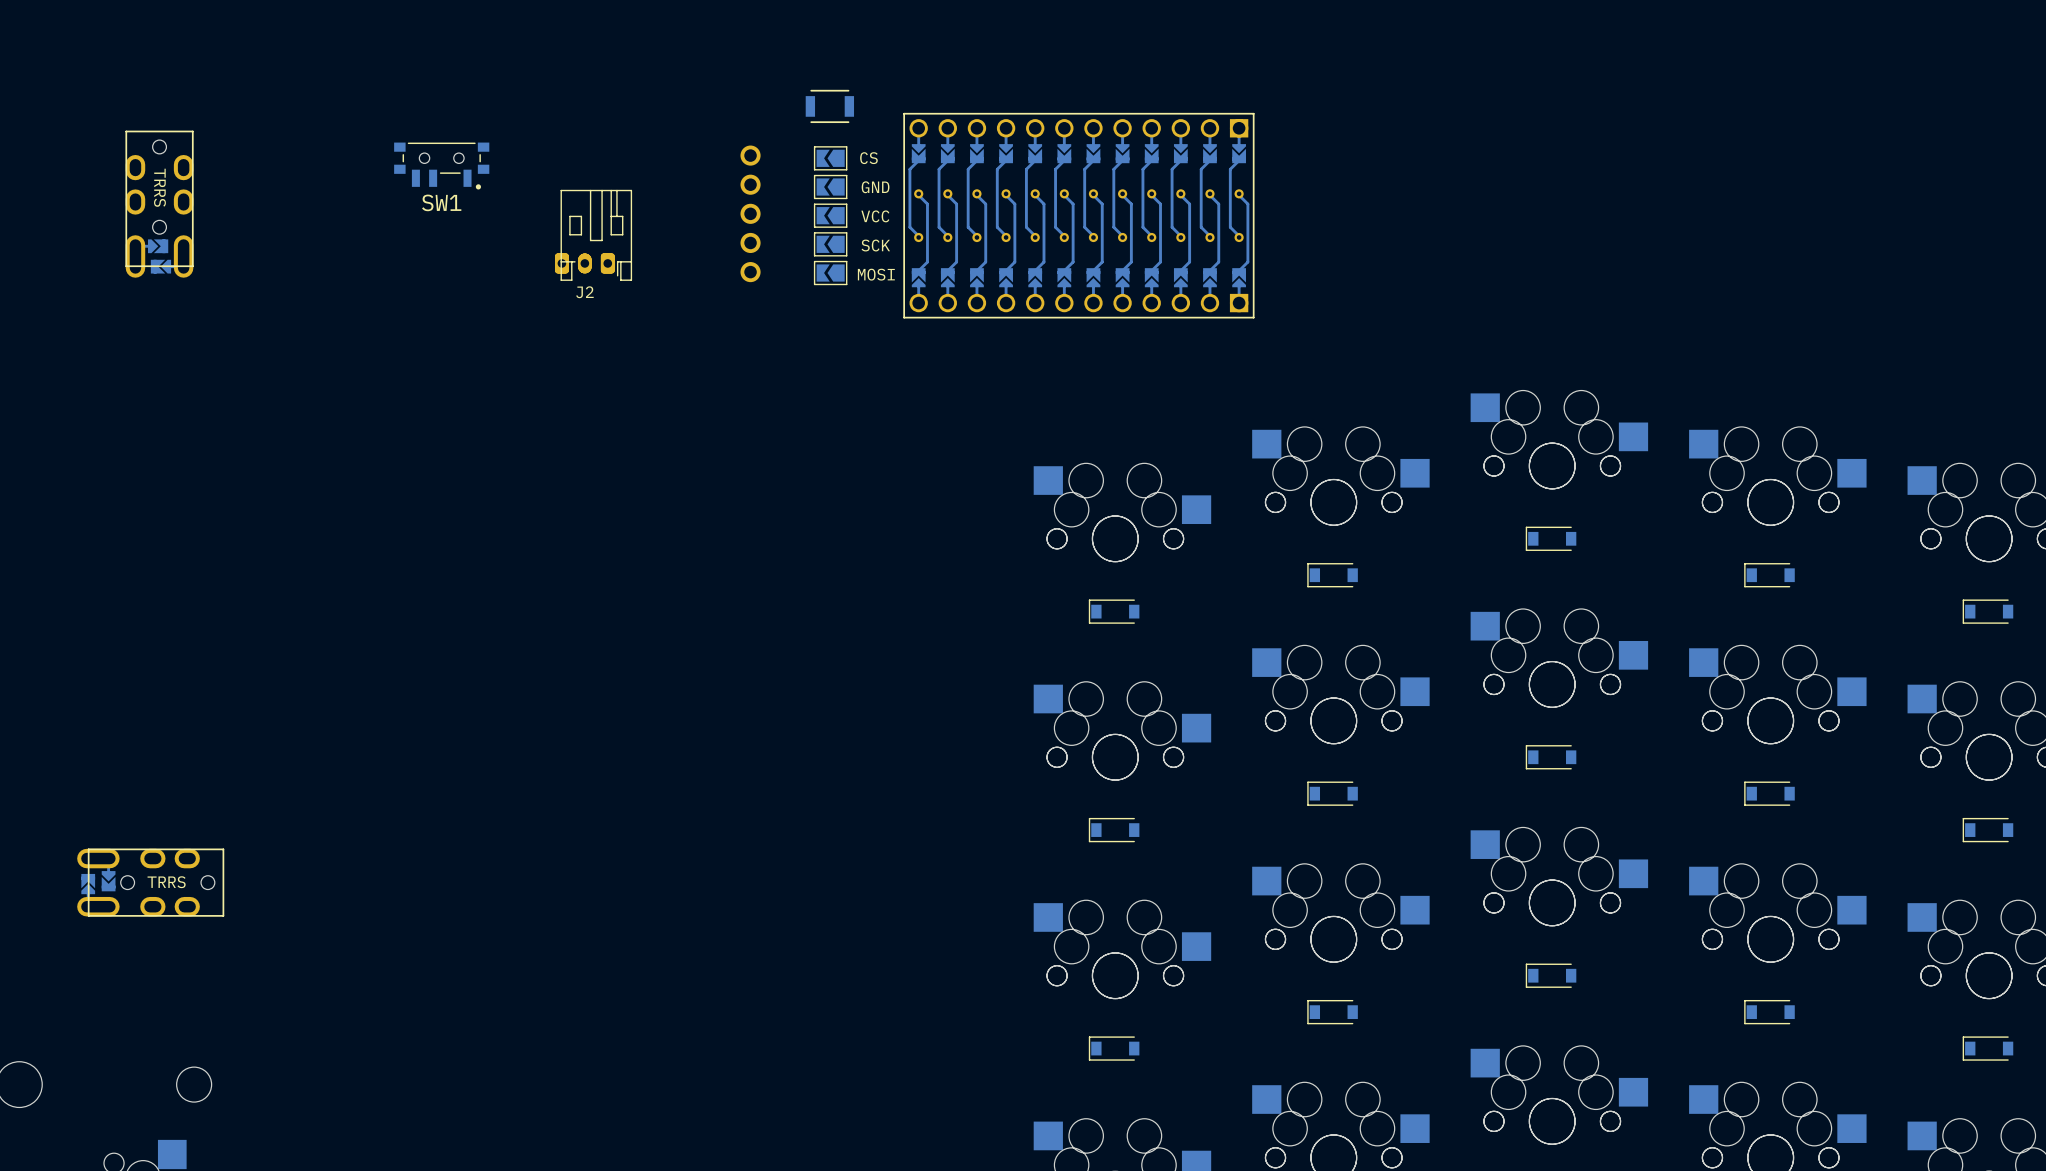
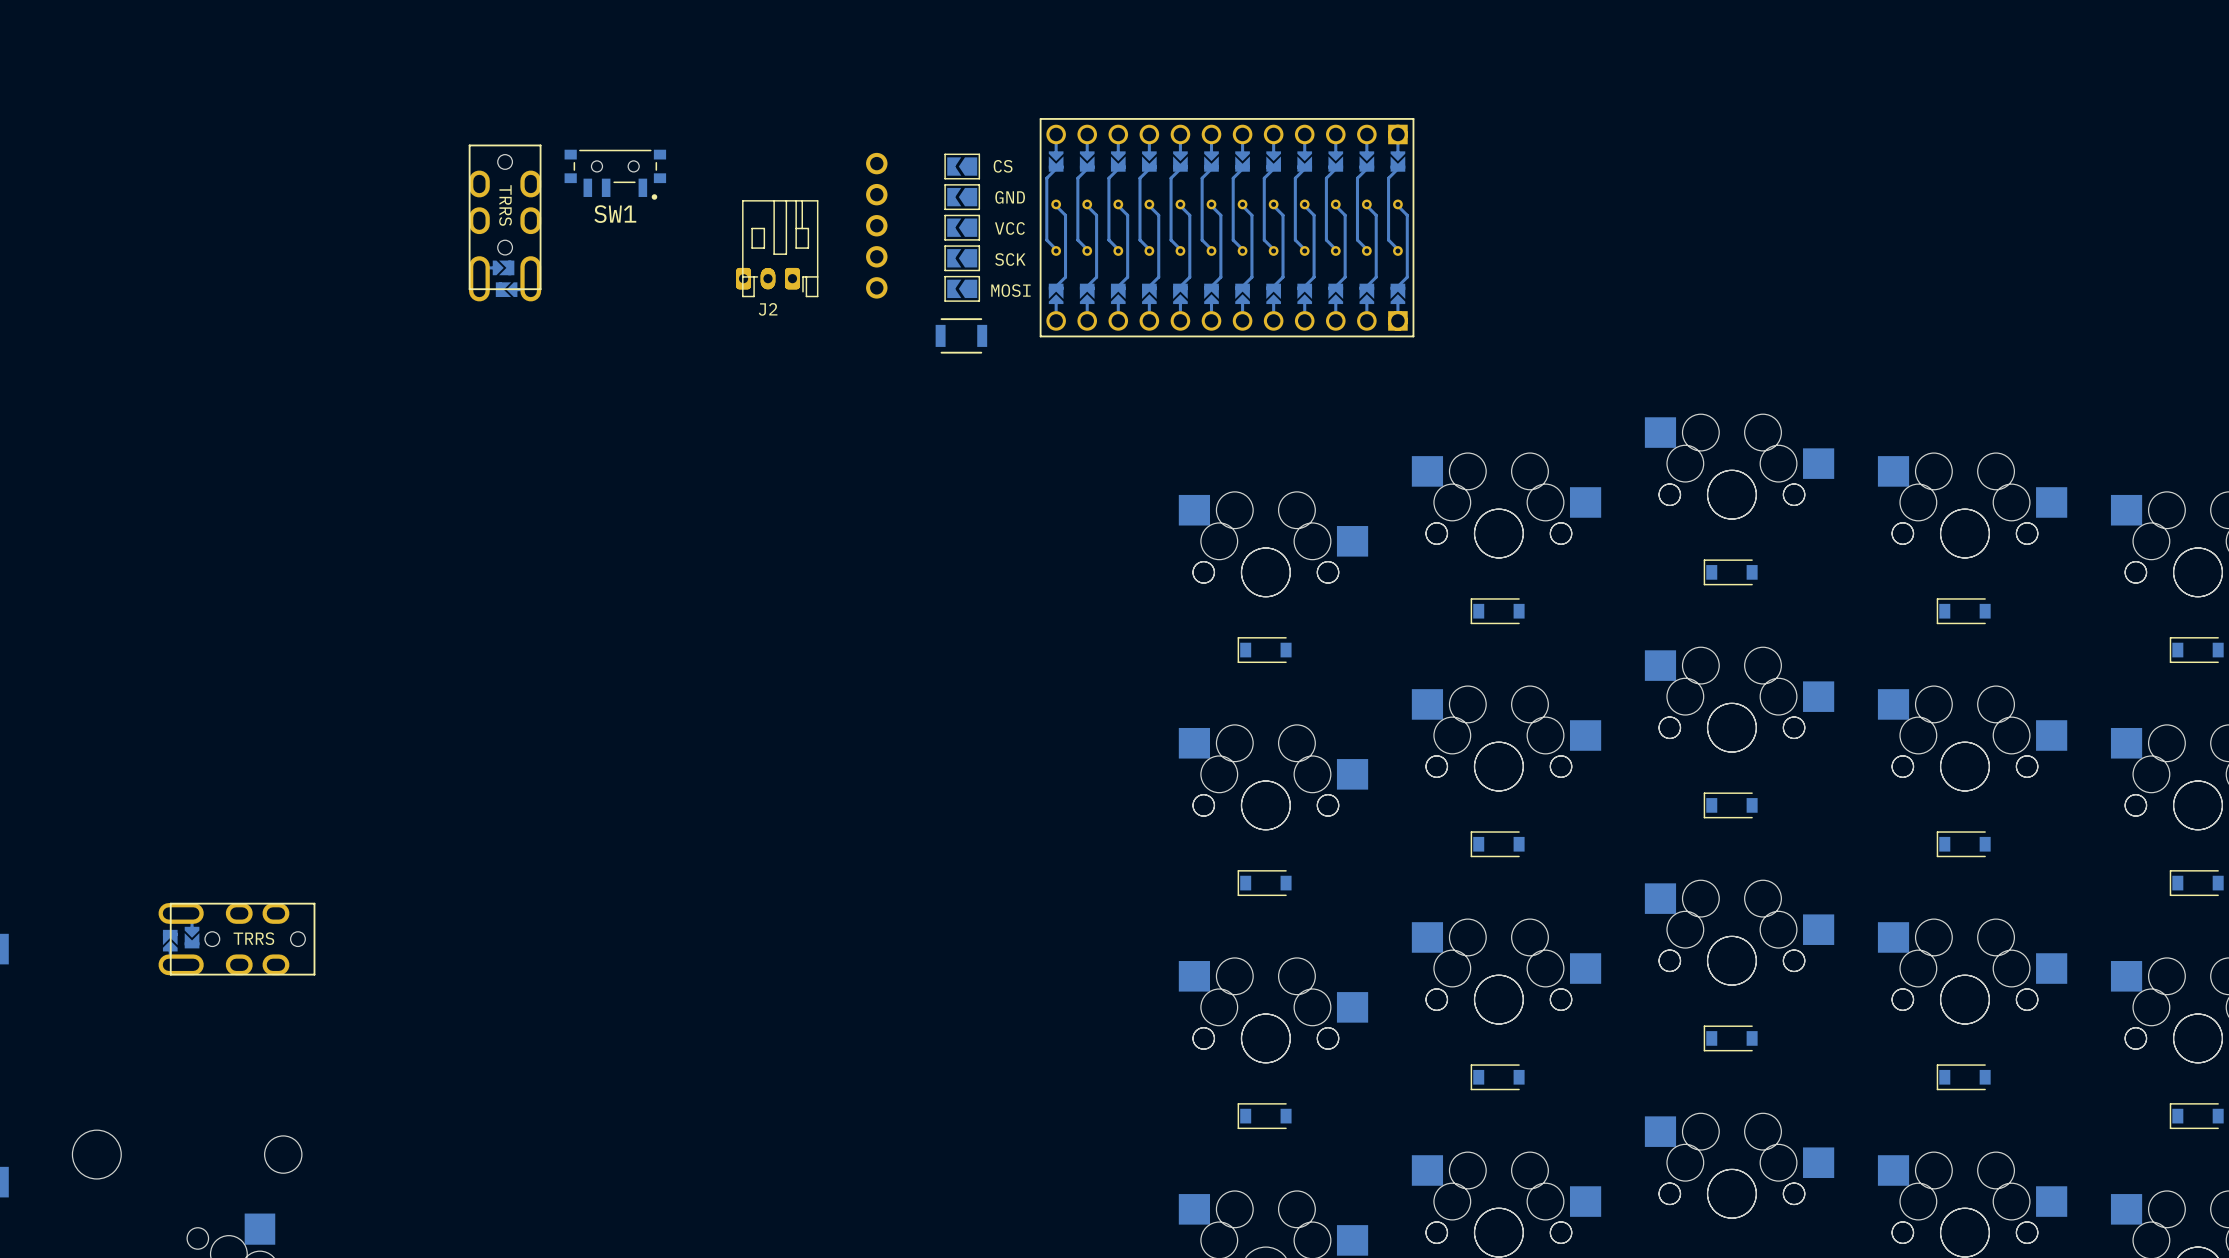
part position: (829, 106) -> (961, 335)
SW1 position: (441, 166) -> (615, 174)
part position: (159, 204) -> (505, 222)
J2 position: (593, 235) -> (777, 248)

